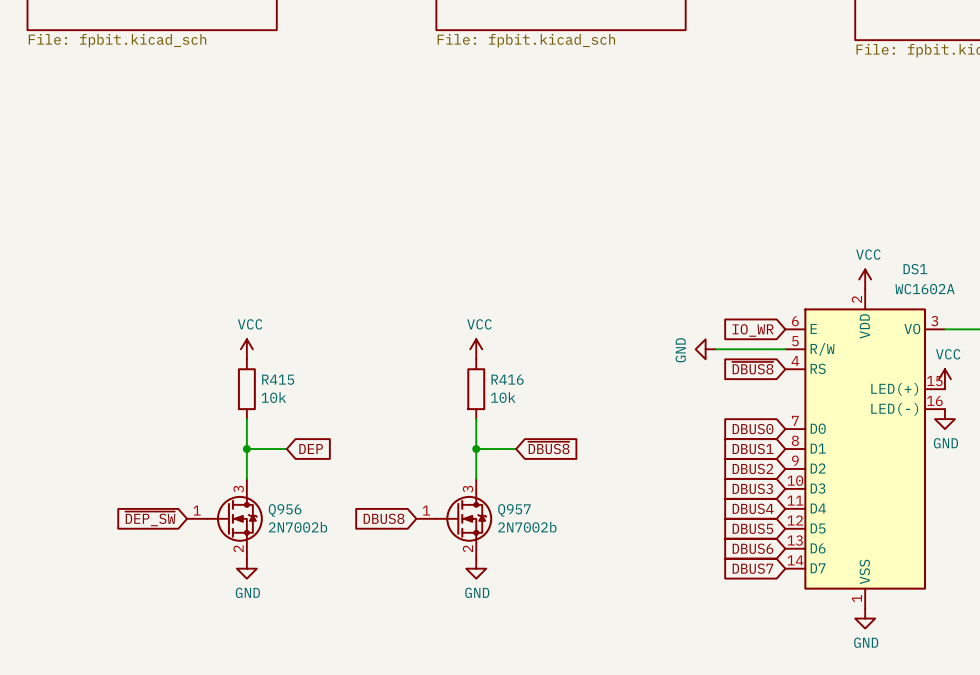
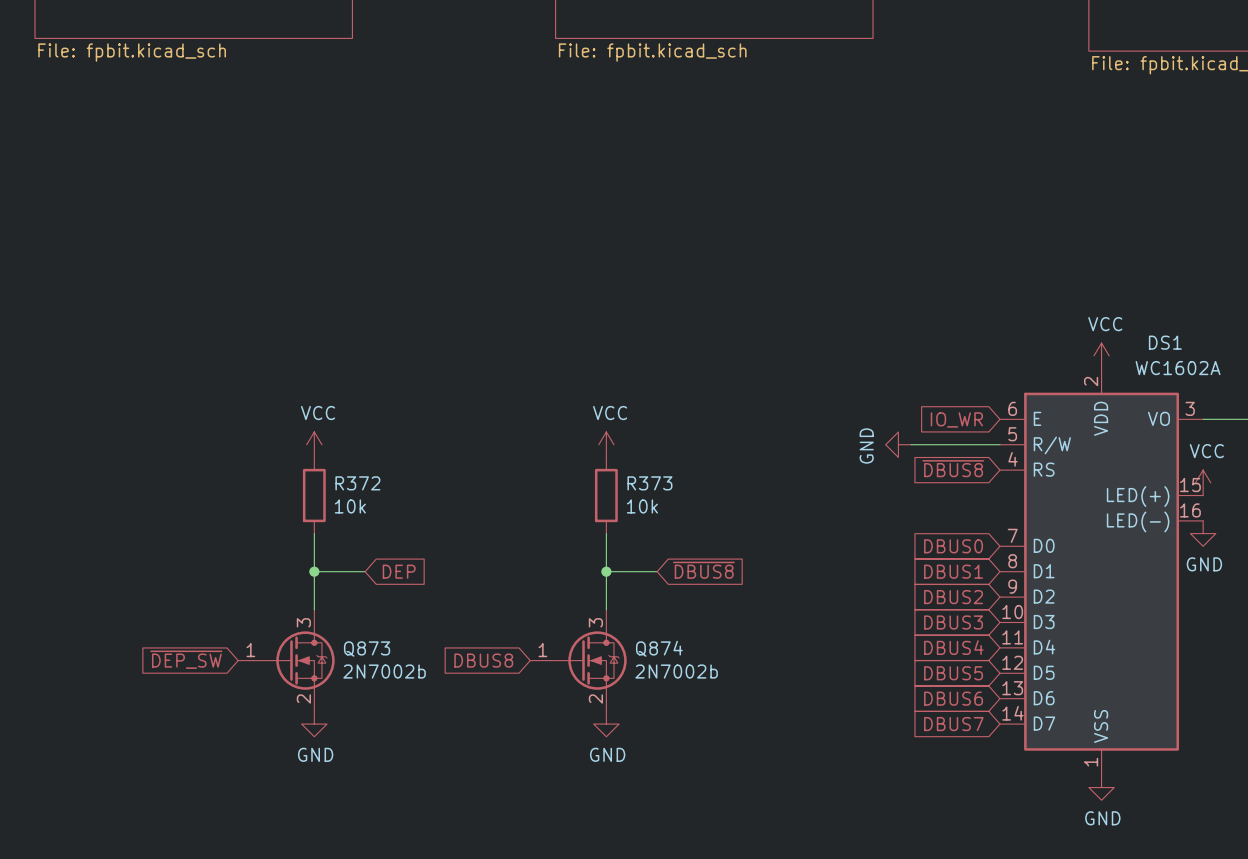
R415 name: R415 (278, 379) -> R372 (357, 483)
R416 name: R416 (507, 379) -> R373 (649, 483)
Q956 name: Q956 (285, 510) -> Q873 (367, 649)
Q957 name: Q957 (514, 510) -> Q874 (659, 648)

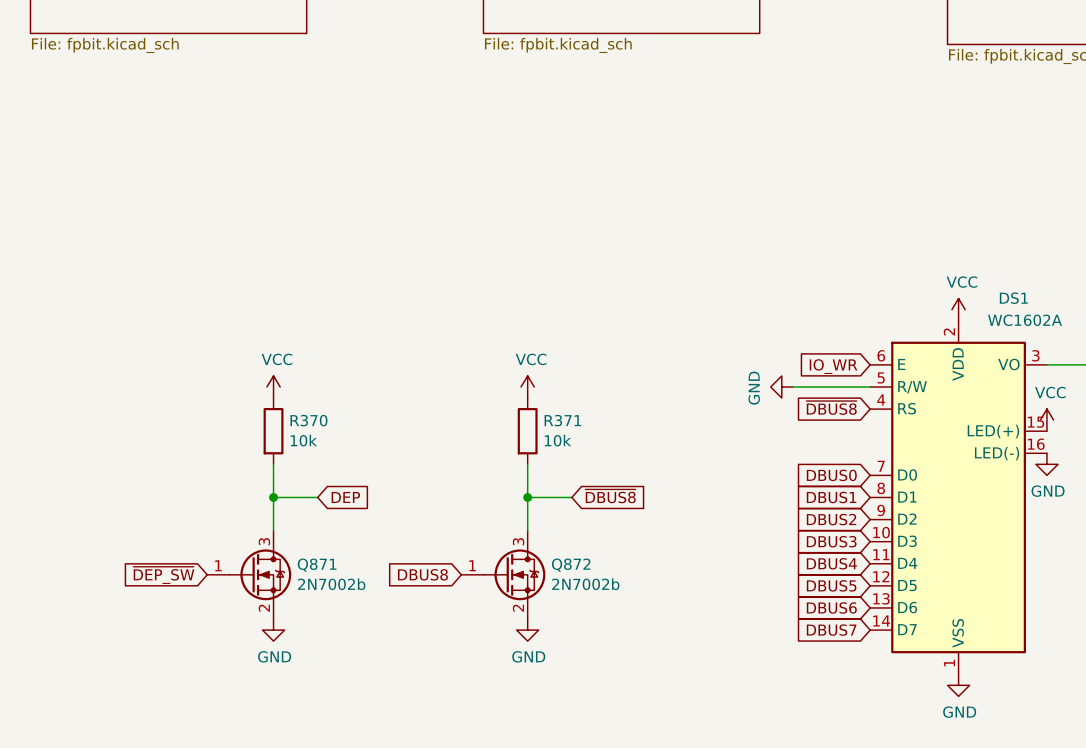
R372 name: R372 (357, 483) -> R370 (308, 420)
R373 name: R373 (649, 483) -> R371 (562, 420)
Q874 name: Q874 (659, 648) -> Q872 (571, 565)
Q873 name: Q873 (367, 649) -> Q871 (317, 565)

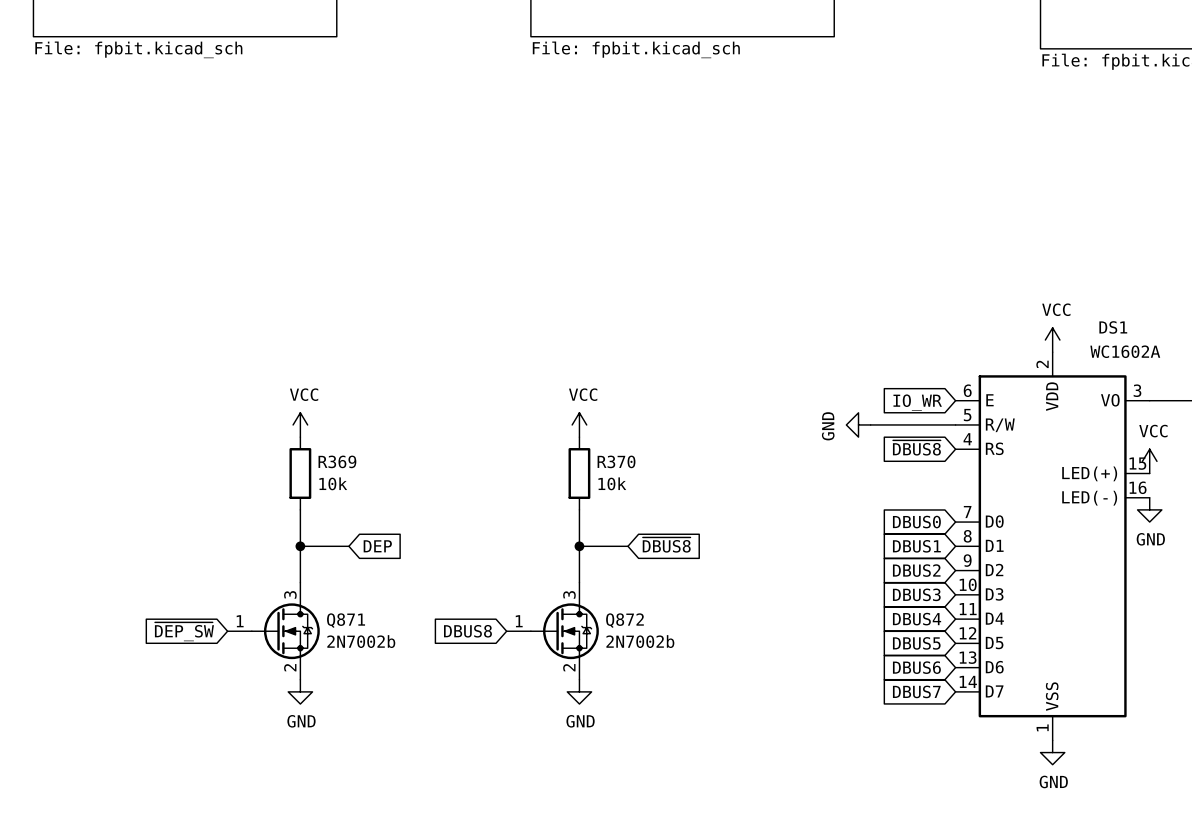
R370 name: R370 (308, 420) -> R369 (337, 461)
R371 name: R371 (562, 420) -> R370 (616, 461)

